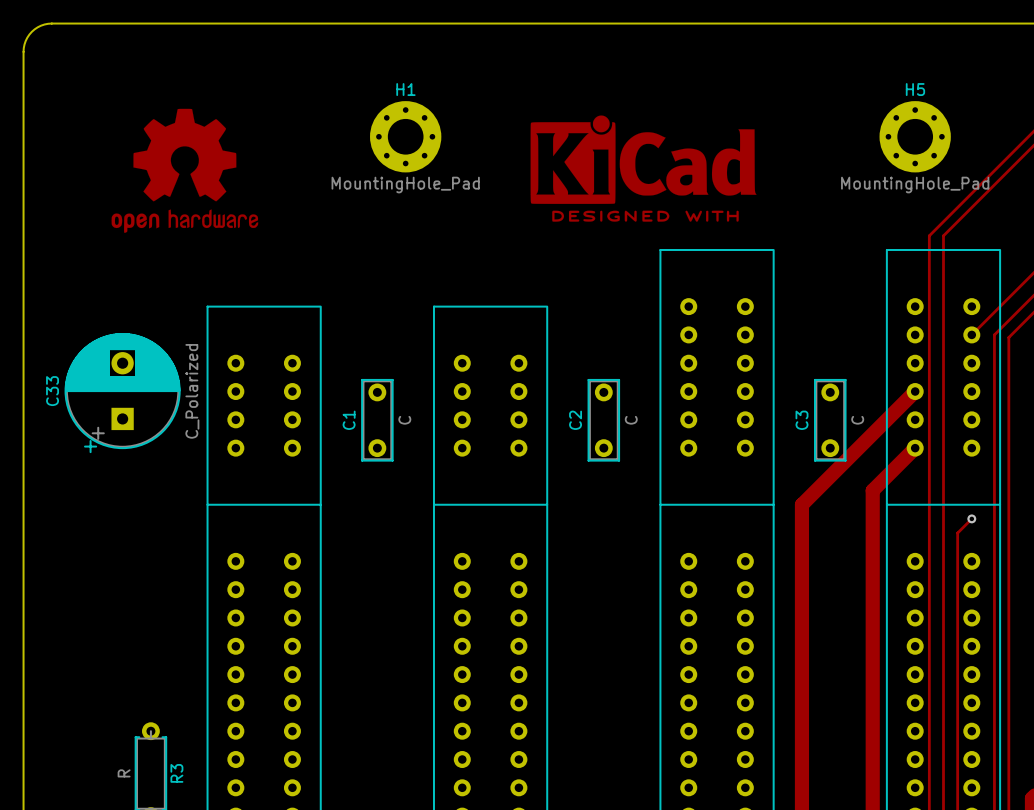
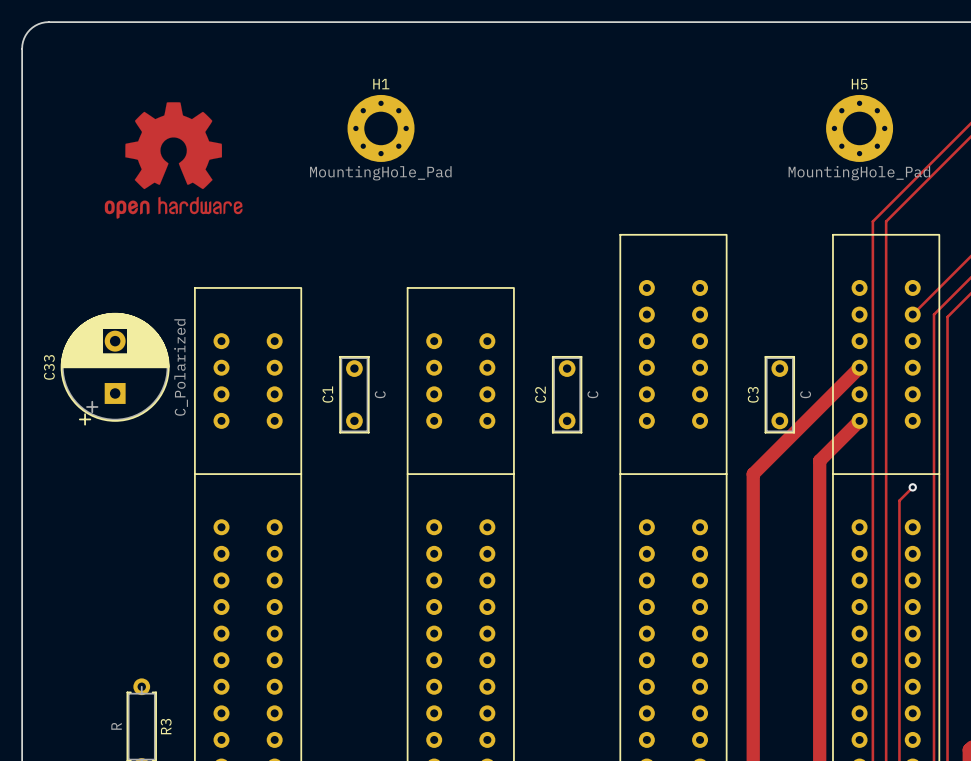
drawing: [530, 115, 757, 222] -> none

